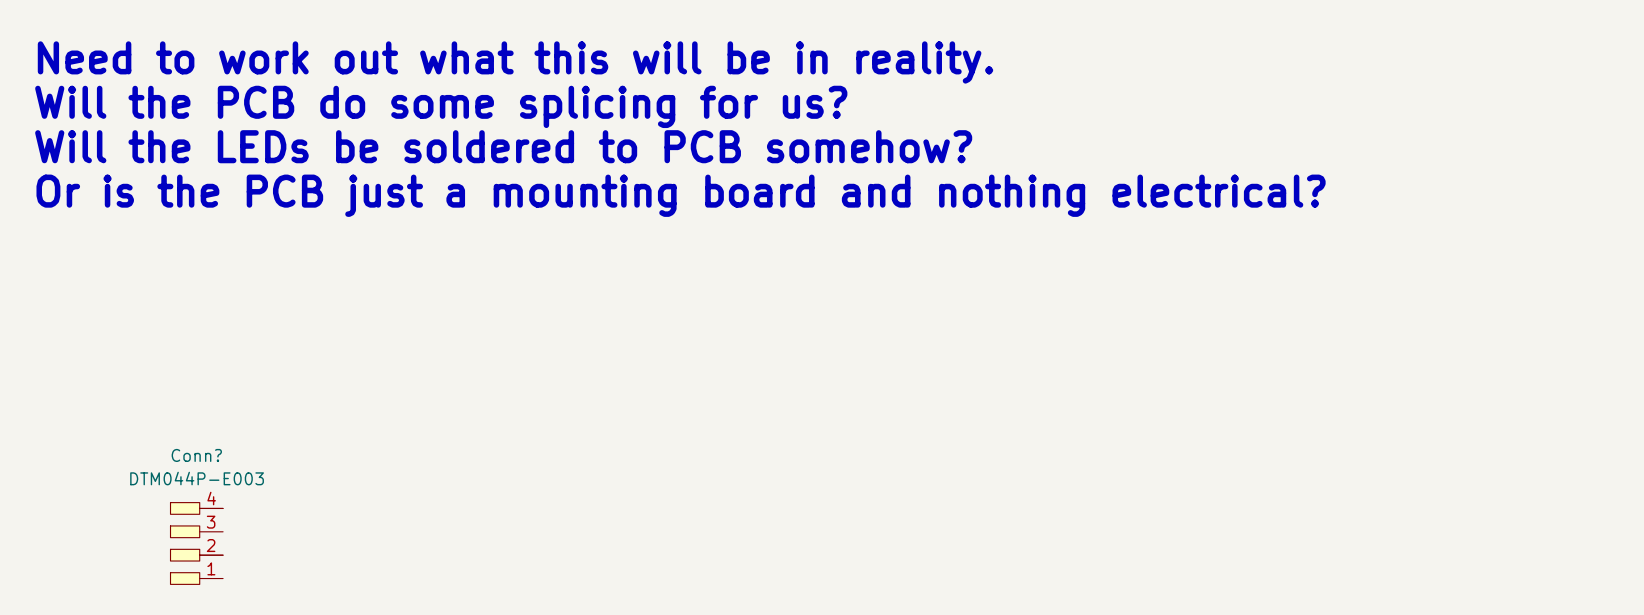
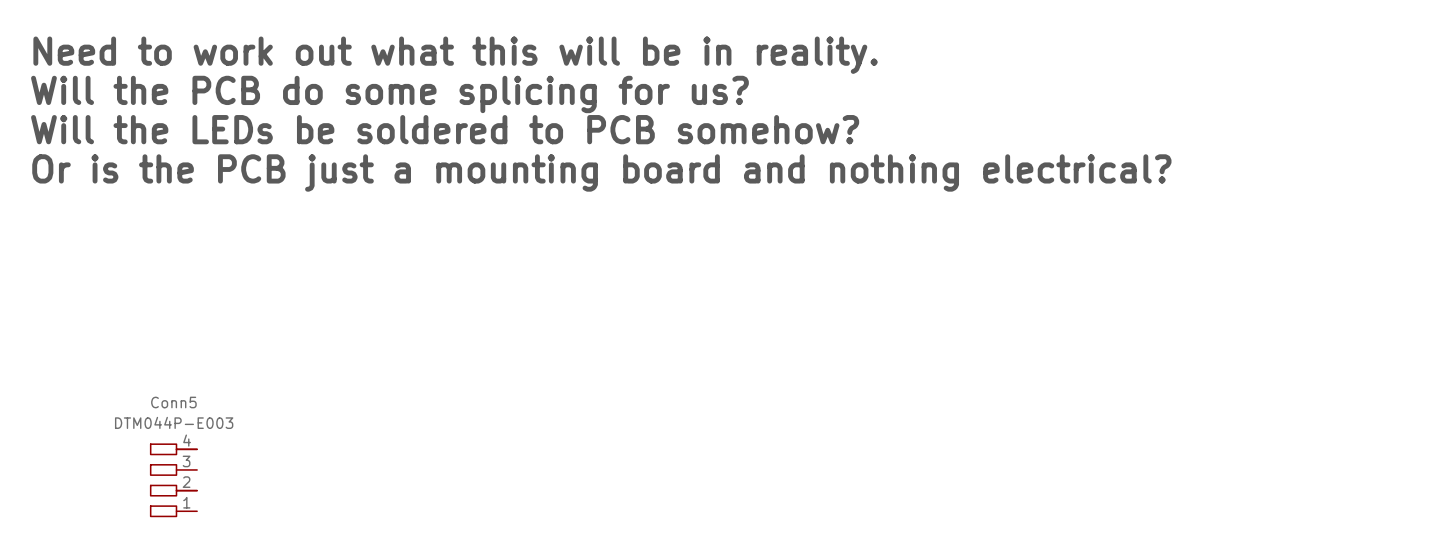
Conn? name: Conn? (196, 455) -> Conn5 (173, 402)

